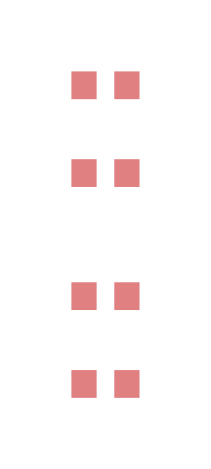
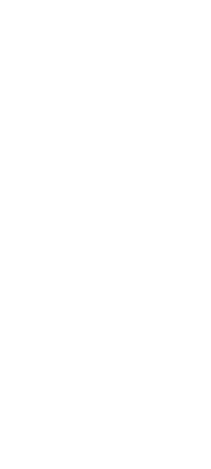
part: (105, 85) -> none
part: (105, 173) -> none
part: (105, 296) -> none
part: (105, 383) -> none

